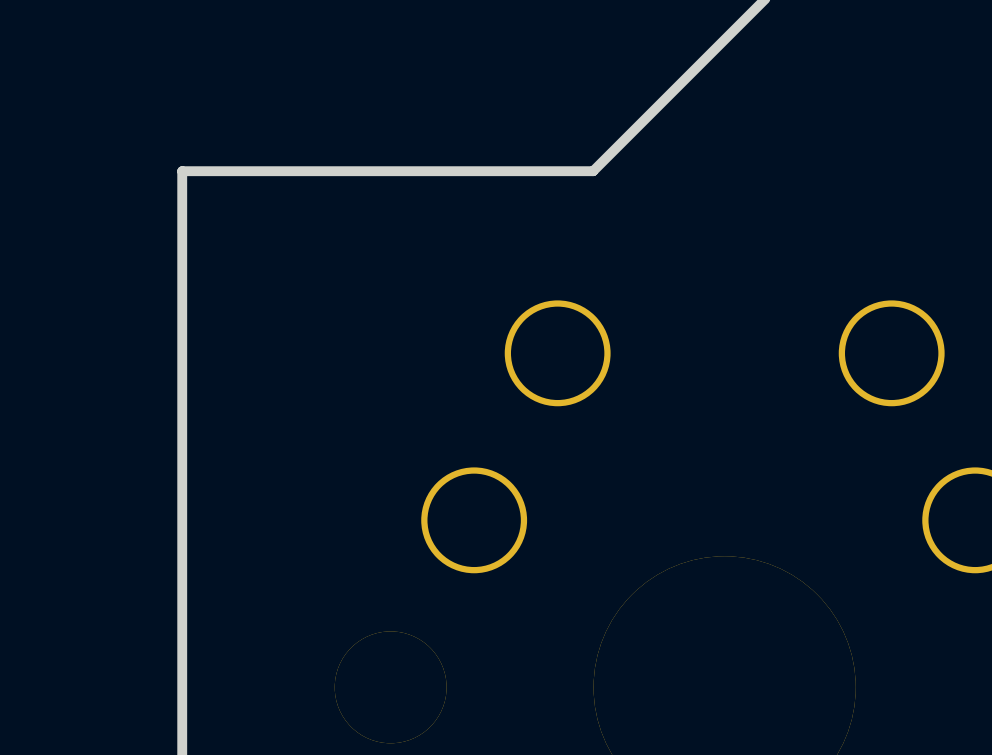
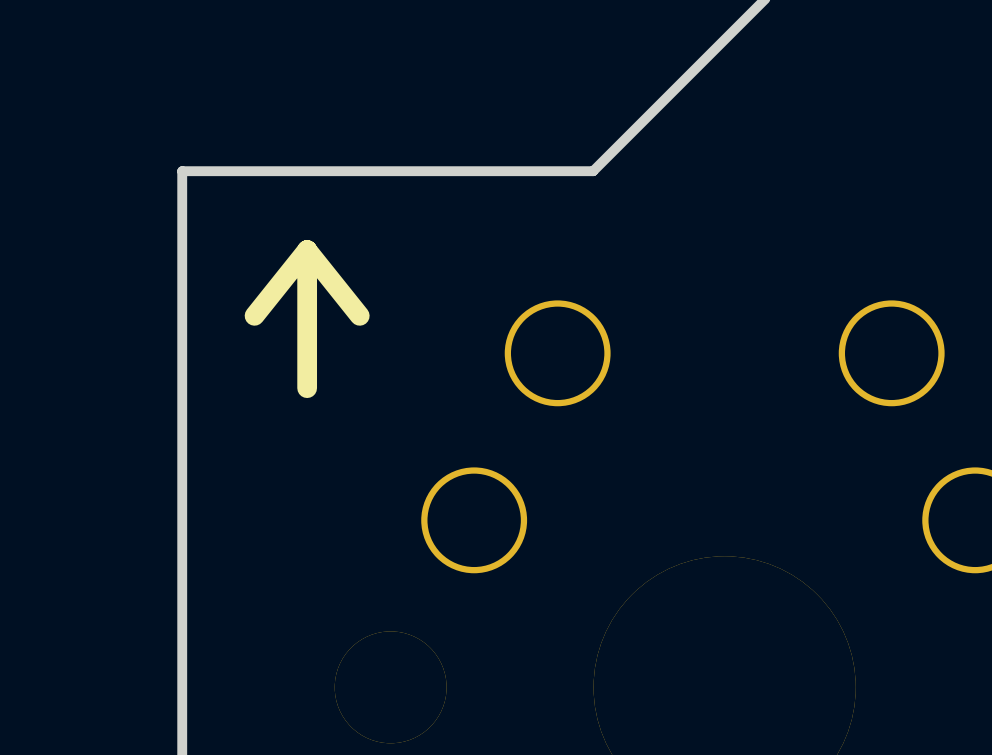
line: none -> (307, 250) (254, 315)
line: none -> (307, 250) (359, 315)
line: none -> (307, 250) (307, 388)

